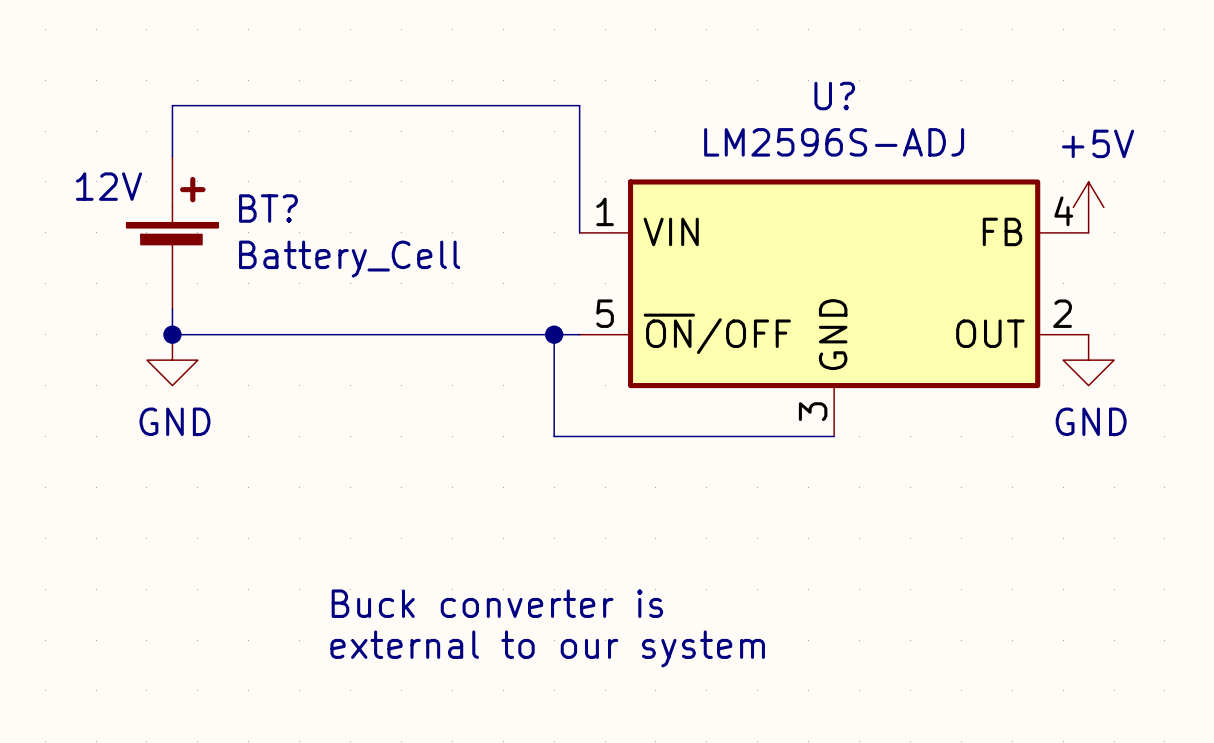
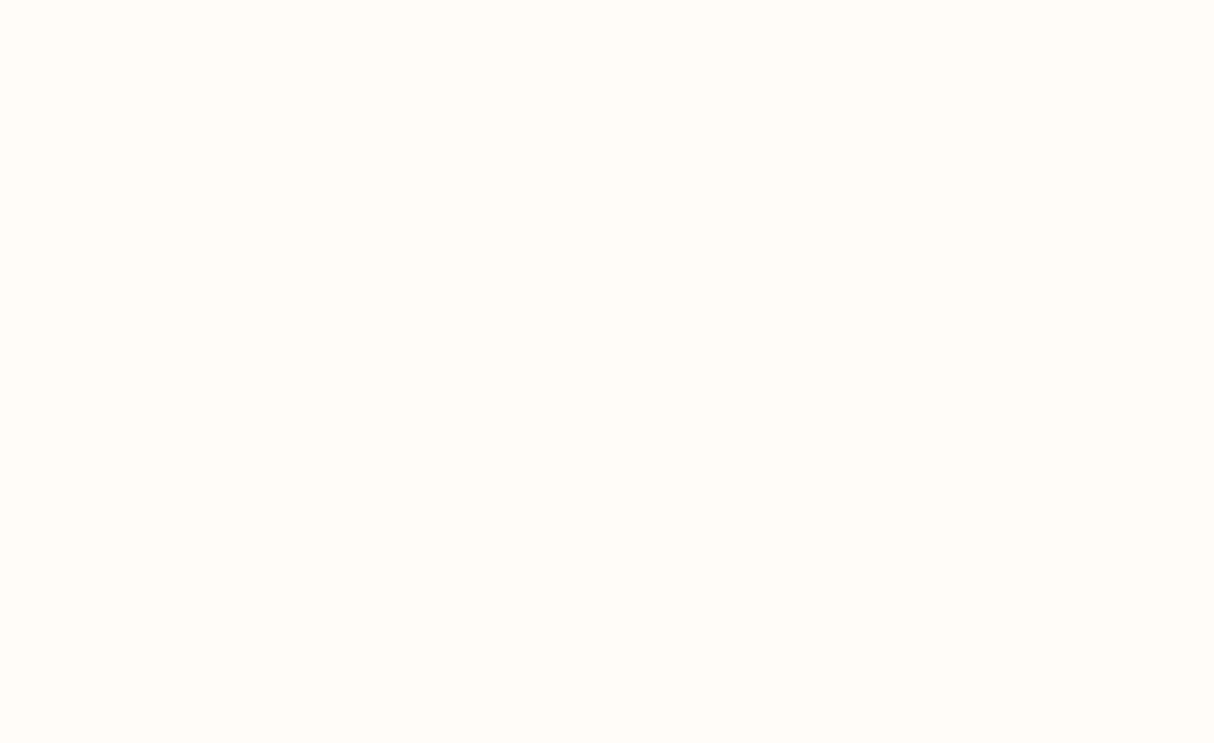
wire: (172, 156) (172, 105) (579, 105) (579, 232) -> none
text: 12V (109, 186) -> none
power symbol: +5V (1088, 207) -> none
BT?: Battery_Cell (172, 232) -> none
U?: LM2596S-ADJ (834, 307) -> none
wire: (172, 309) (172, 334) (579, 334) -> none
junction: (172, 334) -> none
wire: (554, 334) (554, 436) (834, 436) -> none
junction: (554, 334) -> none
power symbol: GND (172, 360) -> none
power symbol: GND (1088, 360) -> none
text: Buck converter is (497, 603) -> none
text: external to our system (547, 648) -> none

